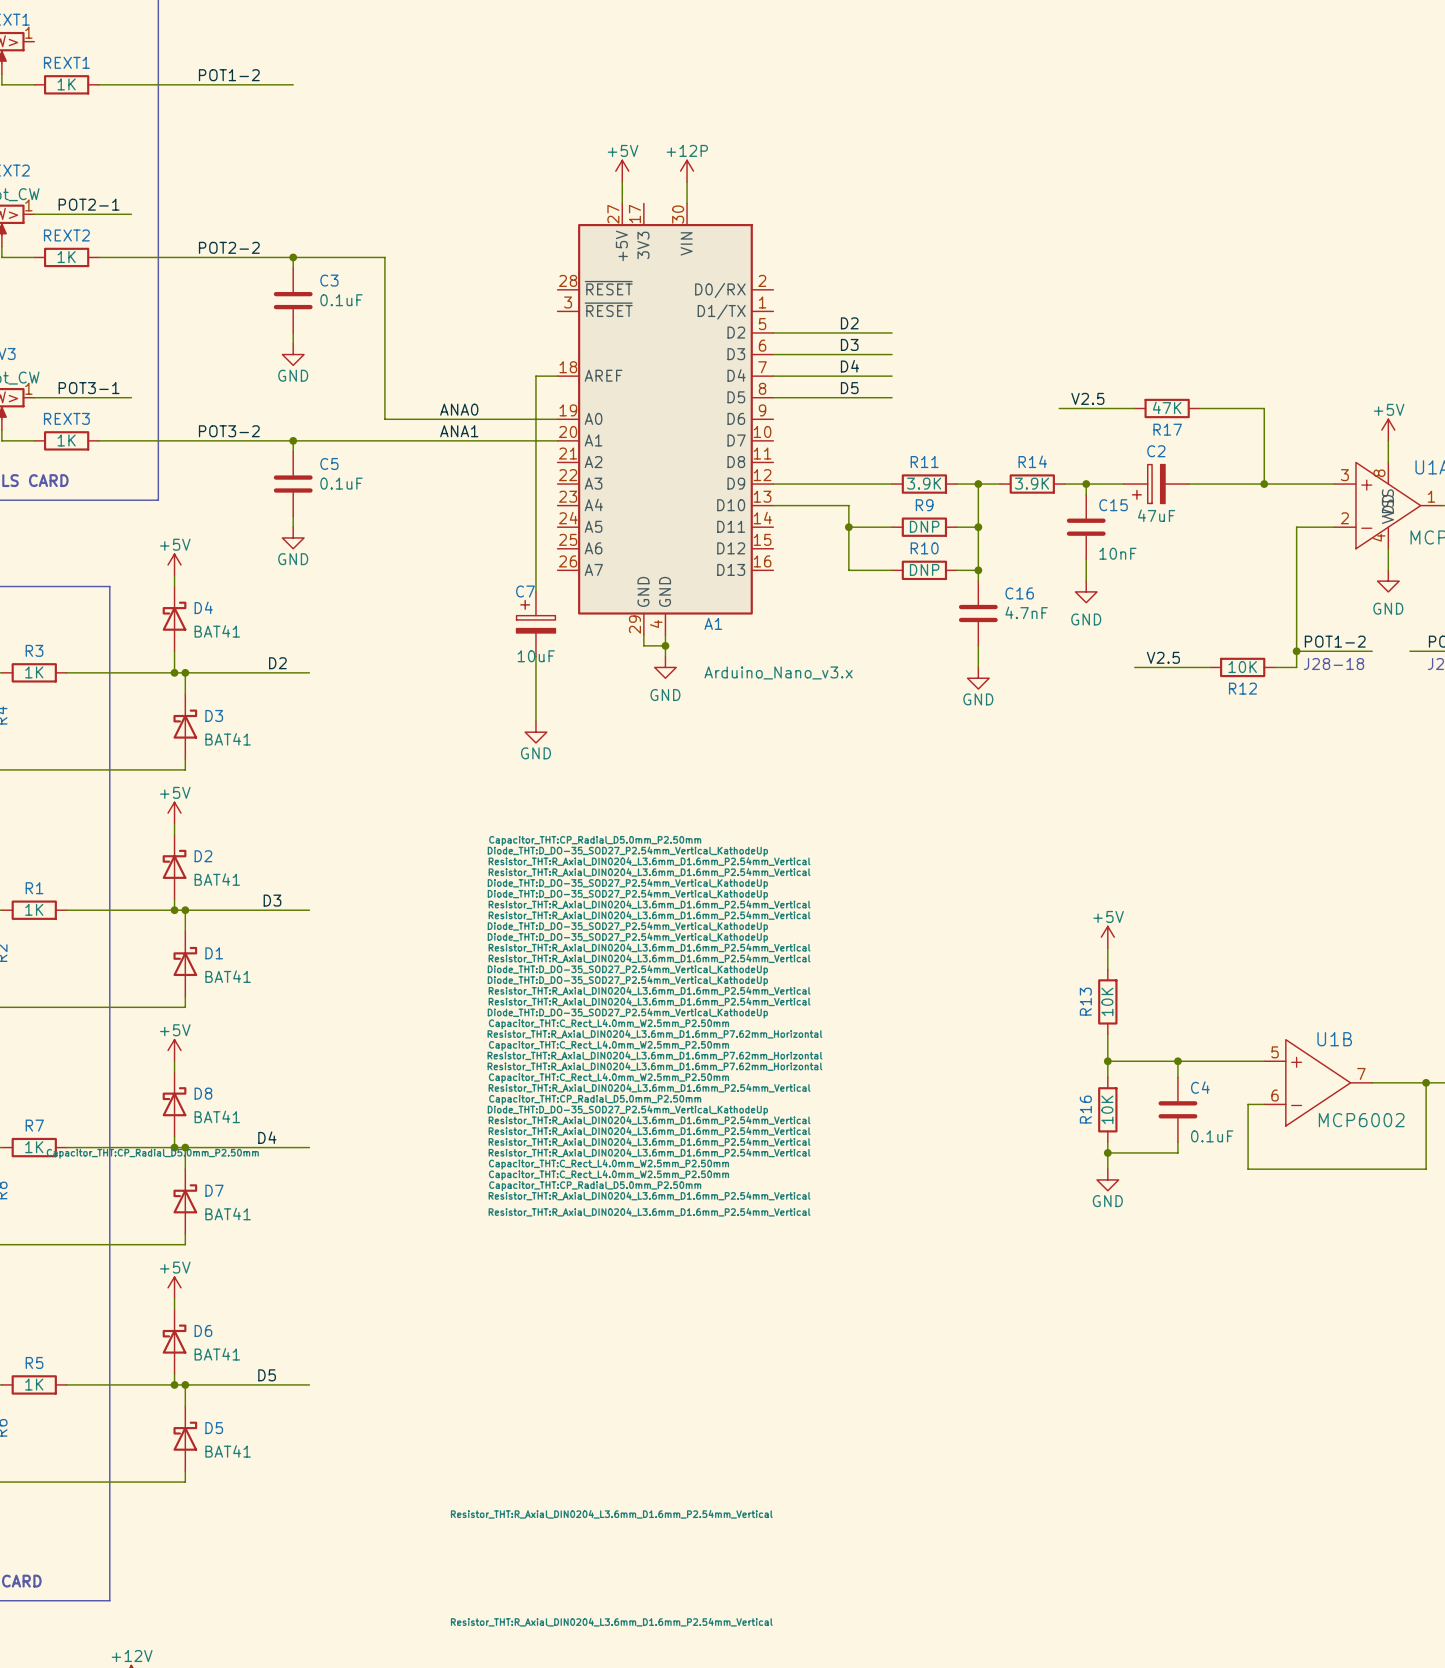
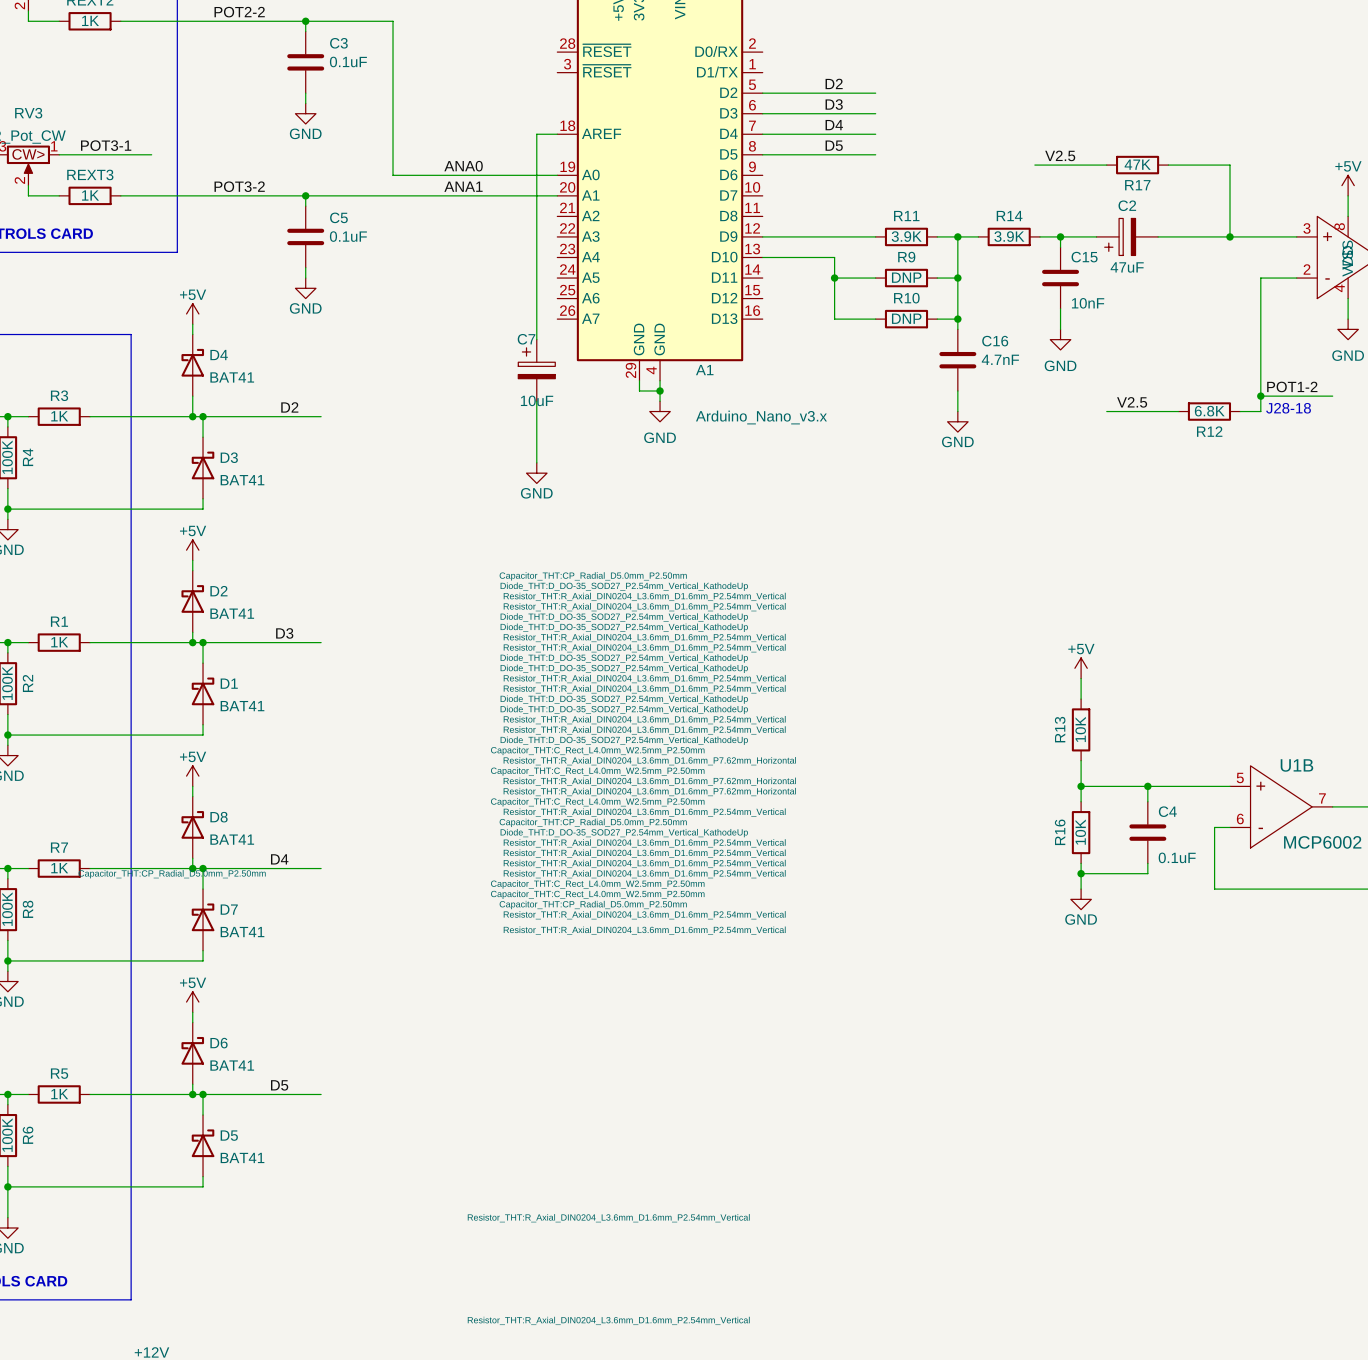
R12 value: 10K (1242, 667) -> 6.8K (1209, 411)

